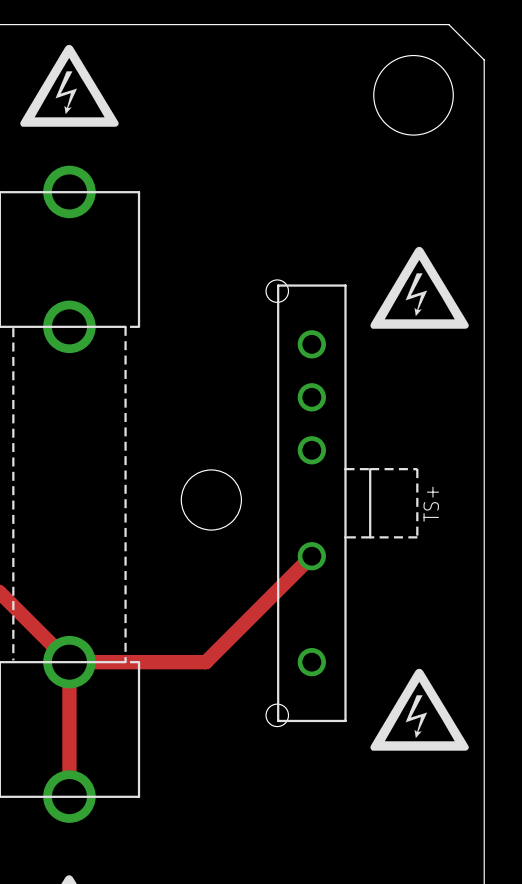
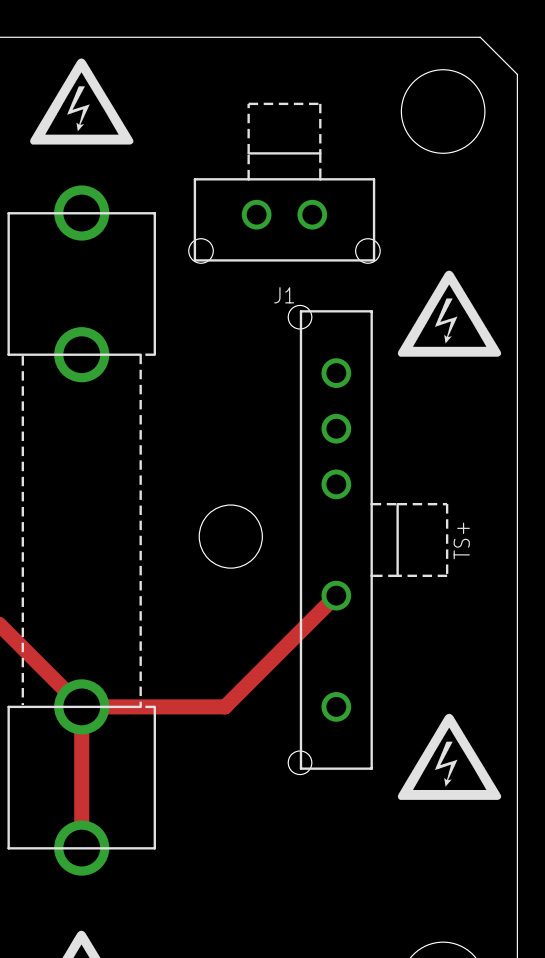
J1: none -> (284, 182)

